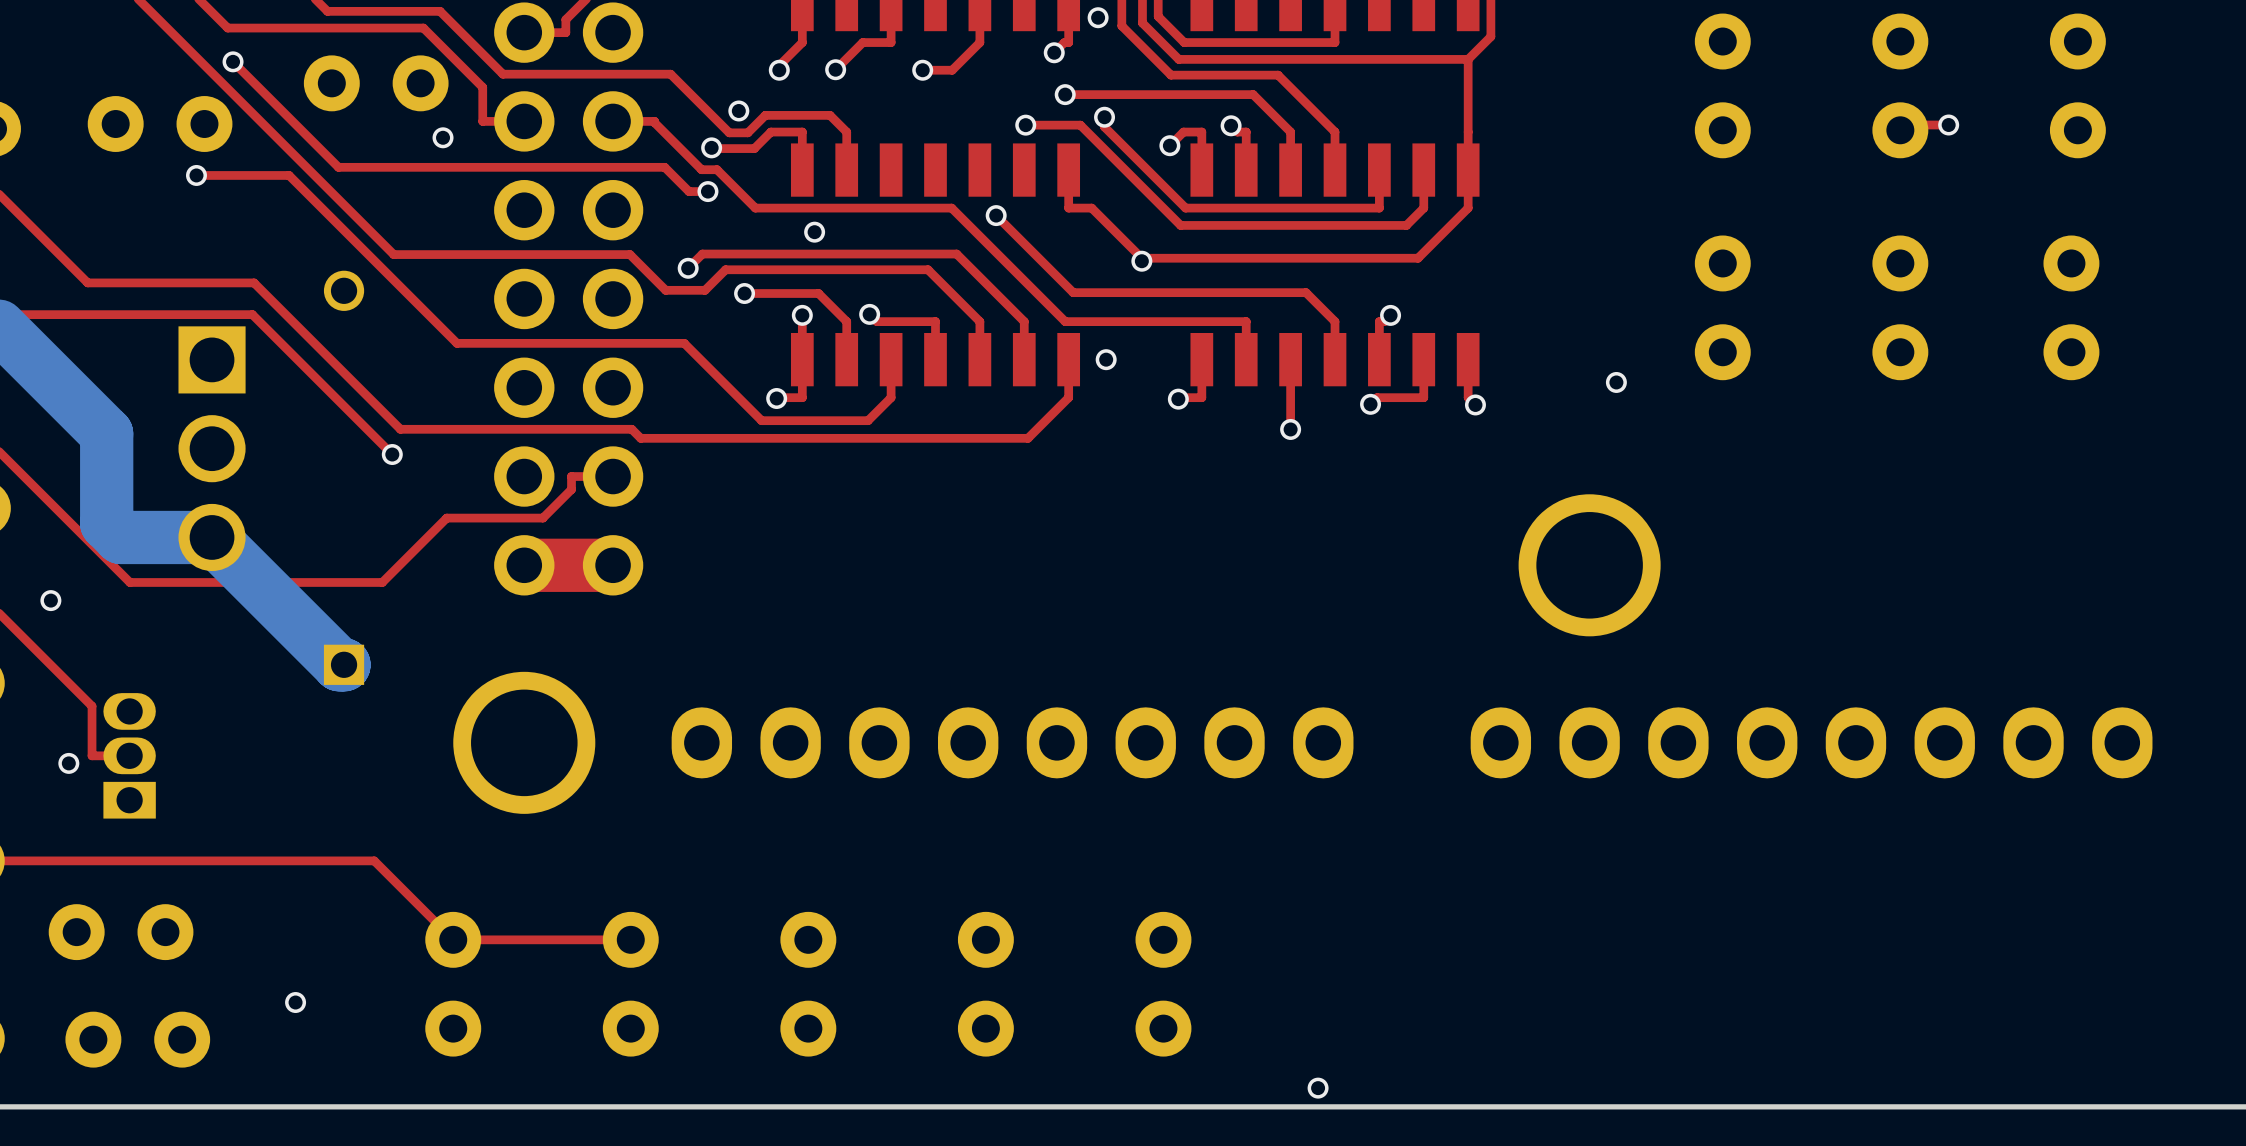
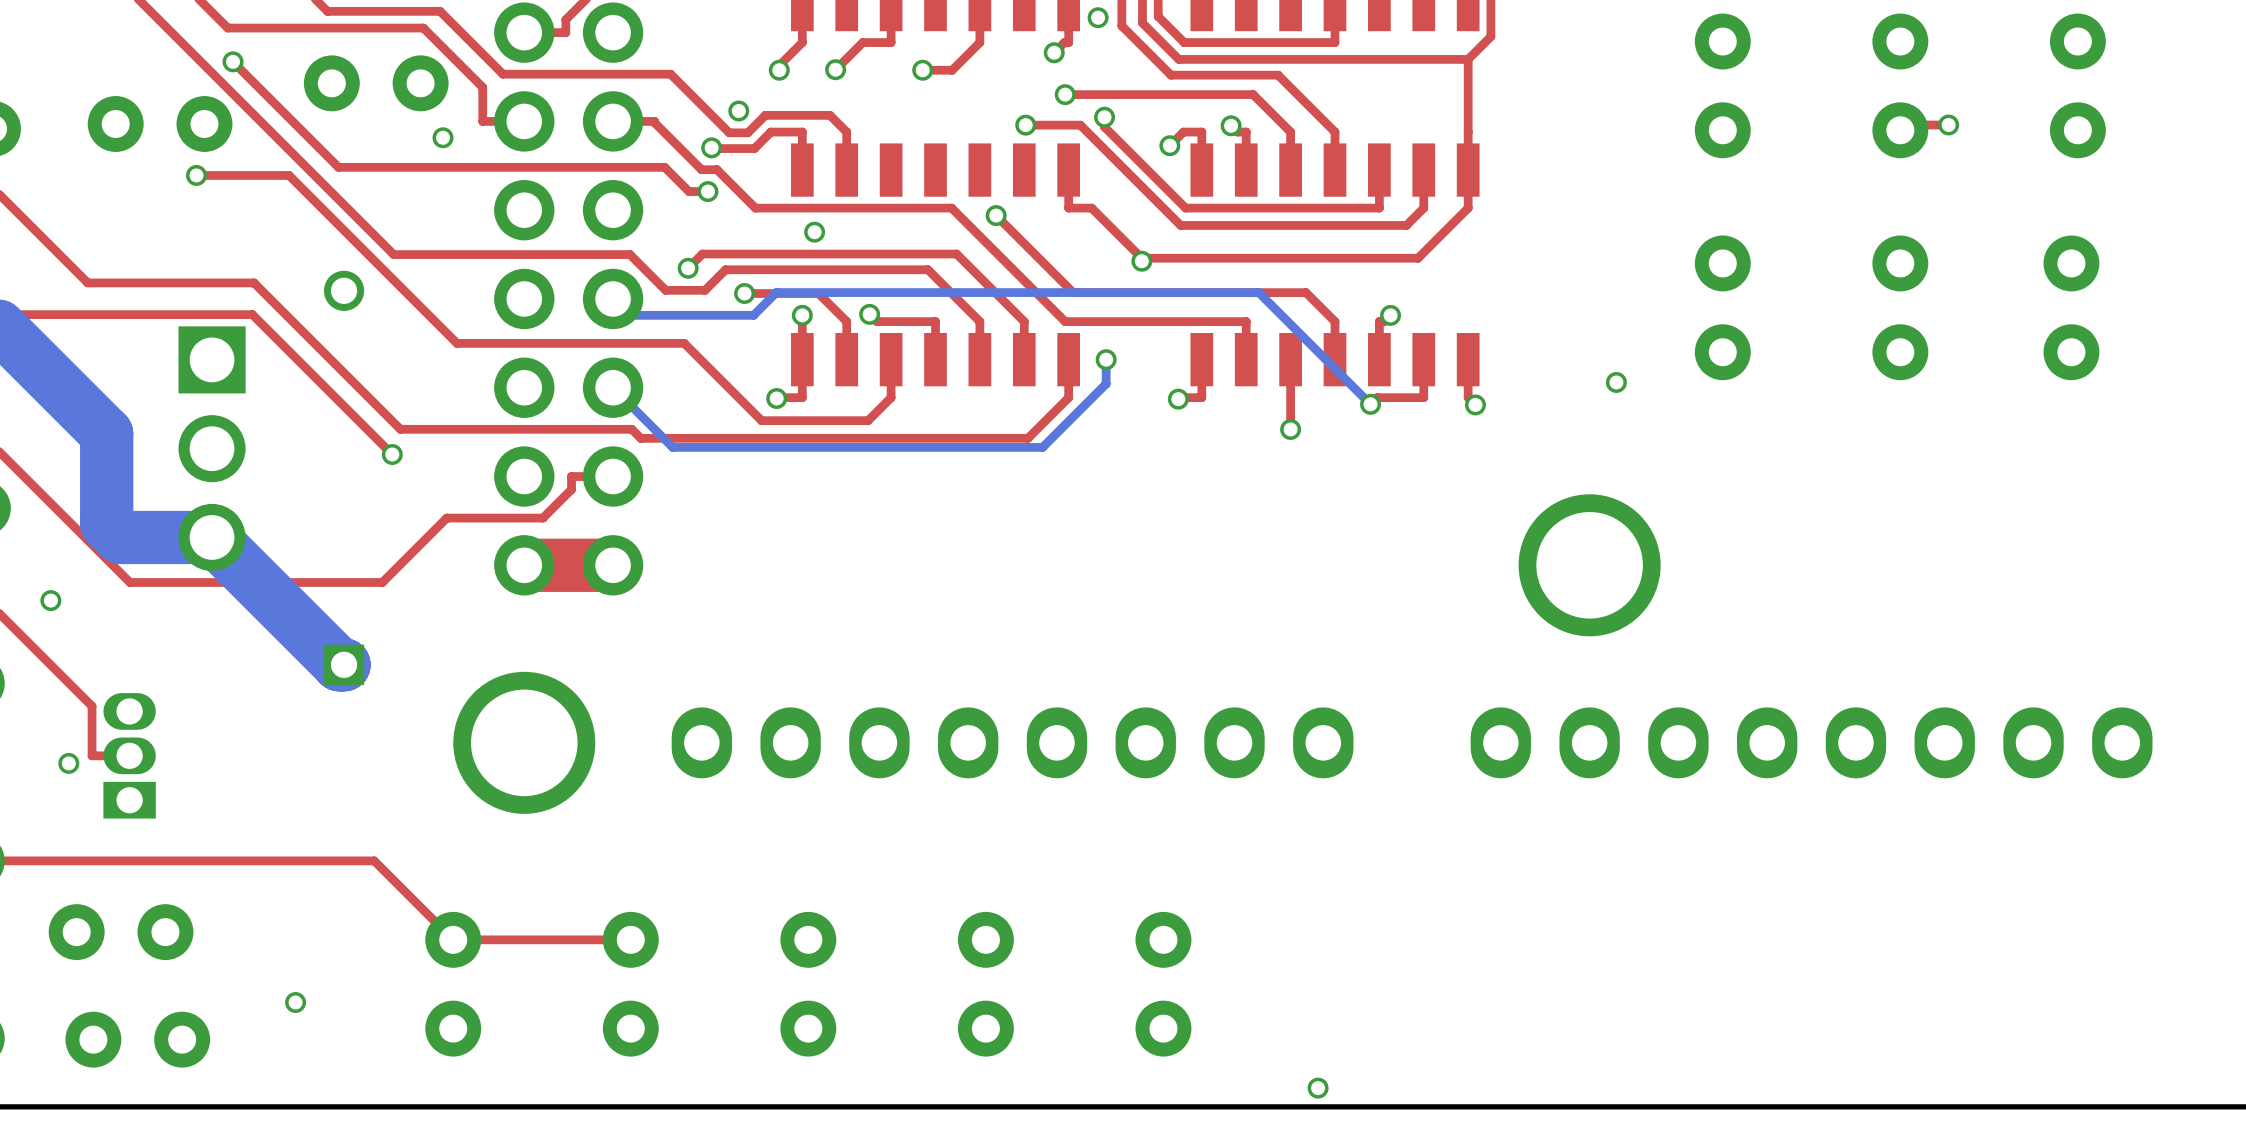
bottom track: none -> (613, 298) (629, 315) (753, 315) (776, 292) (1258, 292) (1370, 404)
bottom track: none -> (1106, 359) (1106, 383) (1042, 447) (672, 447) (613, 387)

